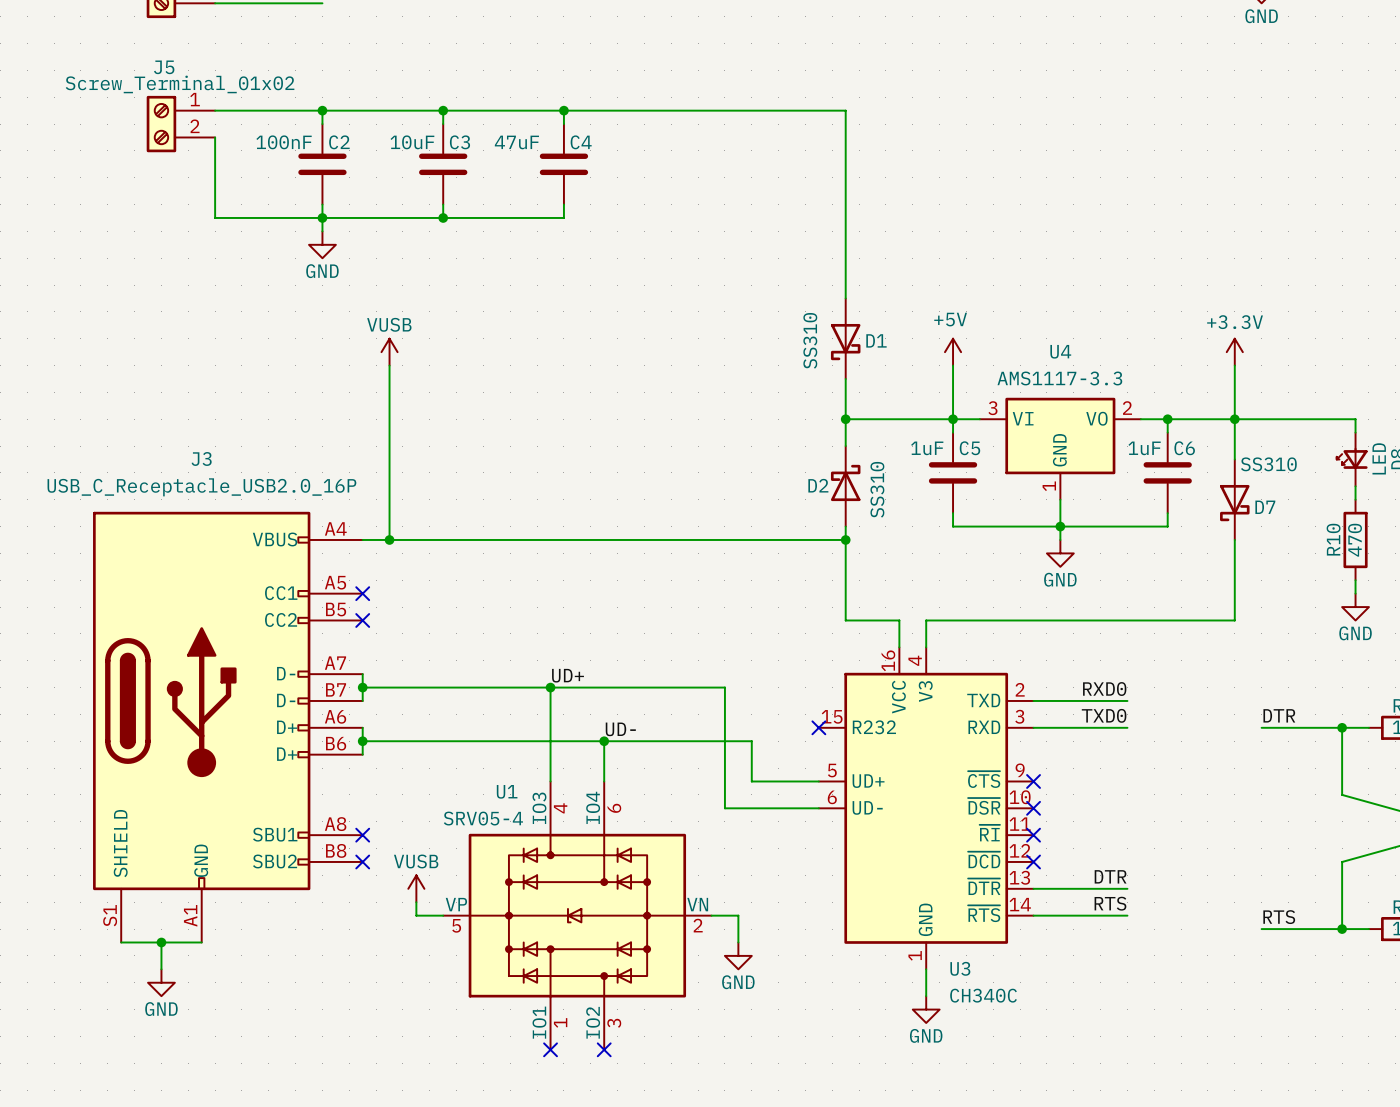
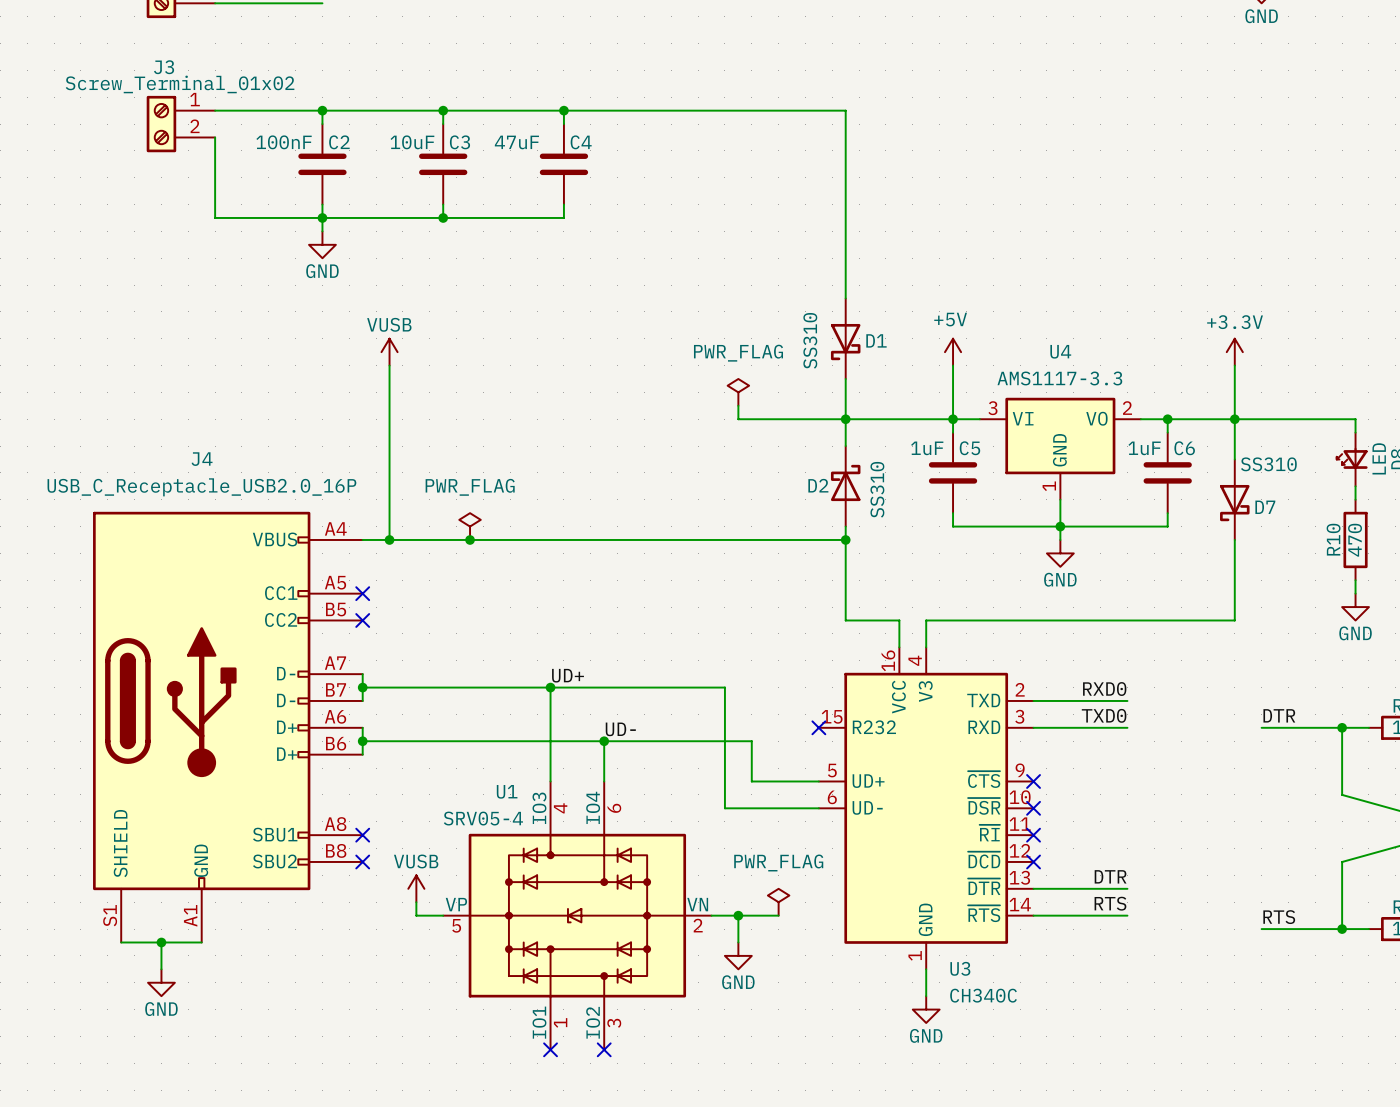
J5 name: J5 (164, 67) -> J3 (164, 67)
power symbol: none -> PWR_FLAG (738, 392)
wire: none -> (738, 405) (738, 419) (845, 419)
J3 name: J3 (201, 458) -> J4 (202, 459)
power symbol: none -> PWR_FLAG (470, 526)
junction: none -> (470, 539)
power symbol: none -> PWR_FLAG (778, 902)
wire: none -> (738, 915) (778, 915)
junction: none -> (738, 915)

